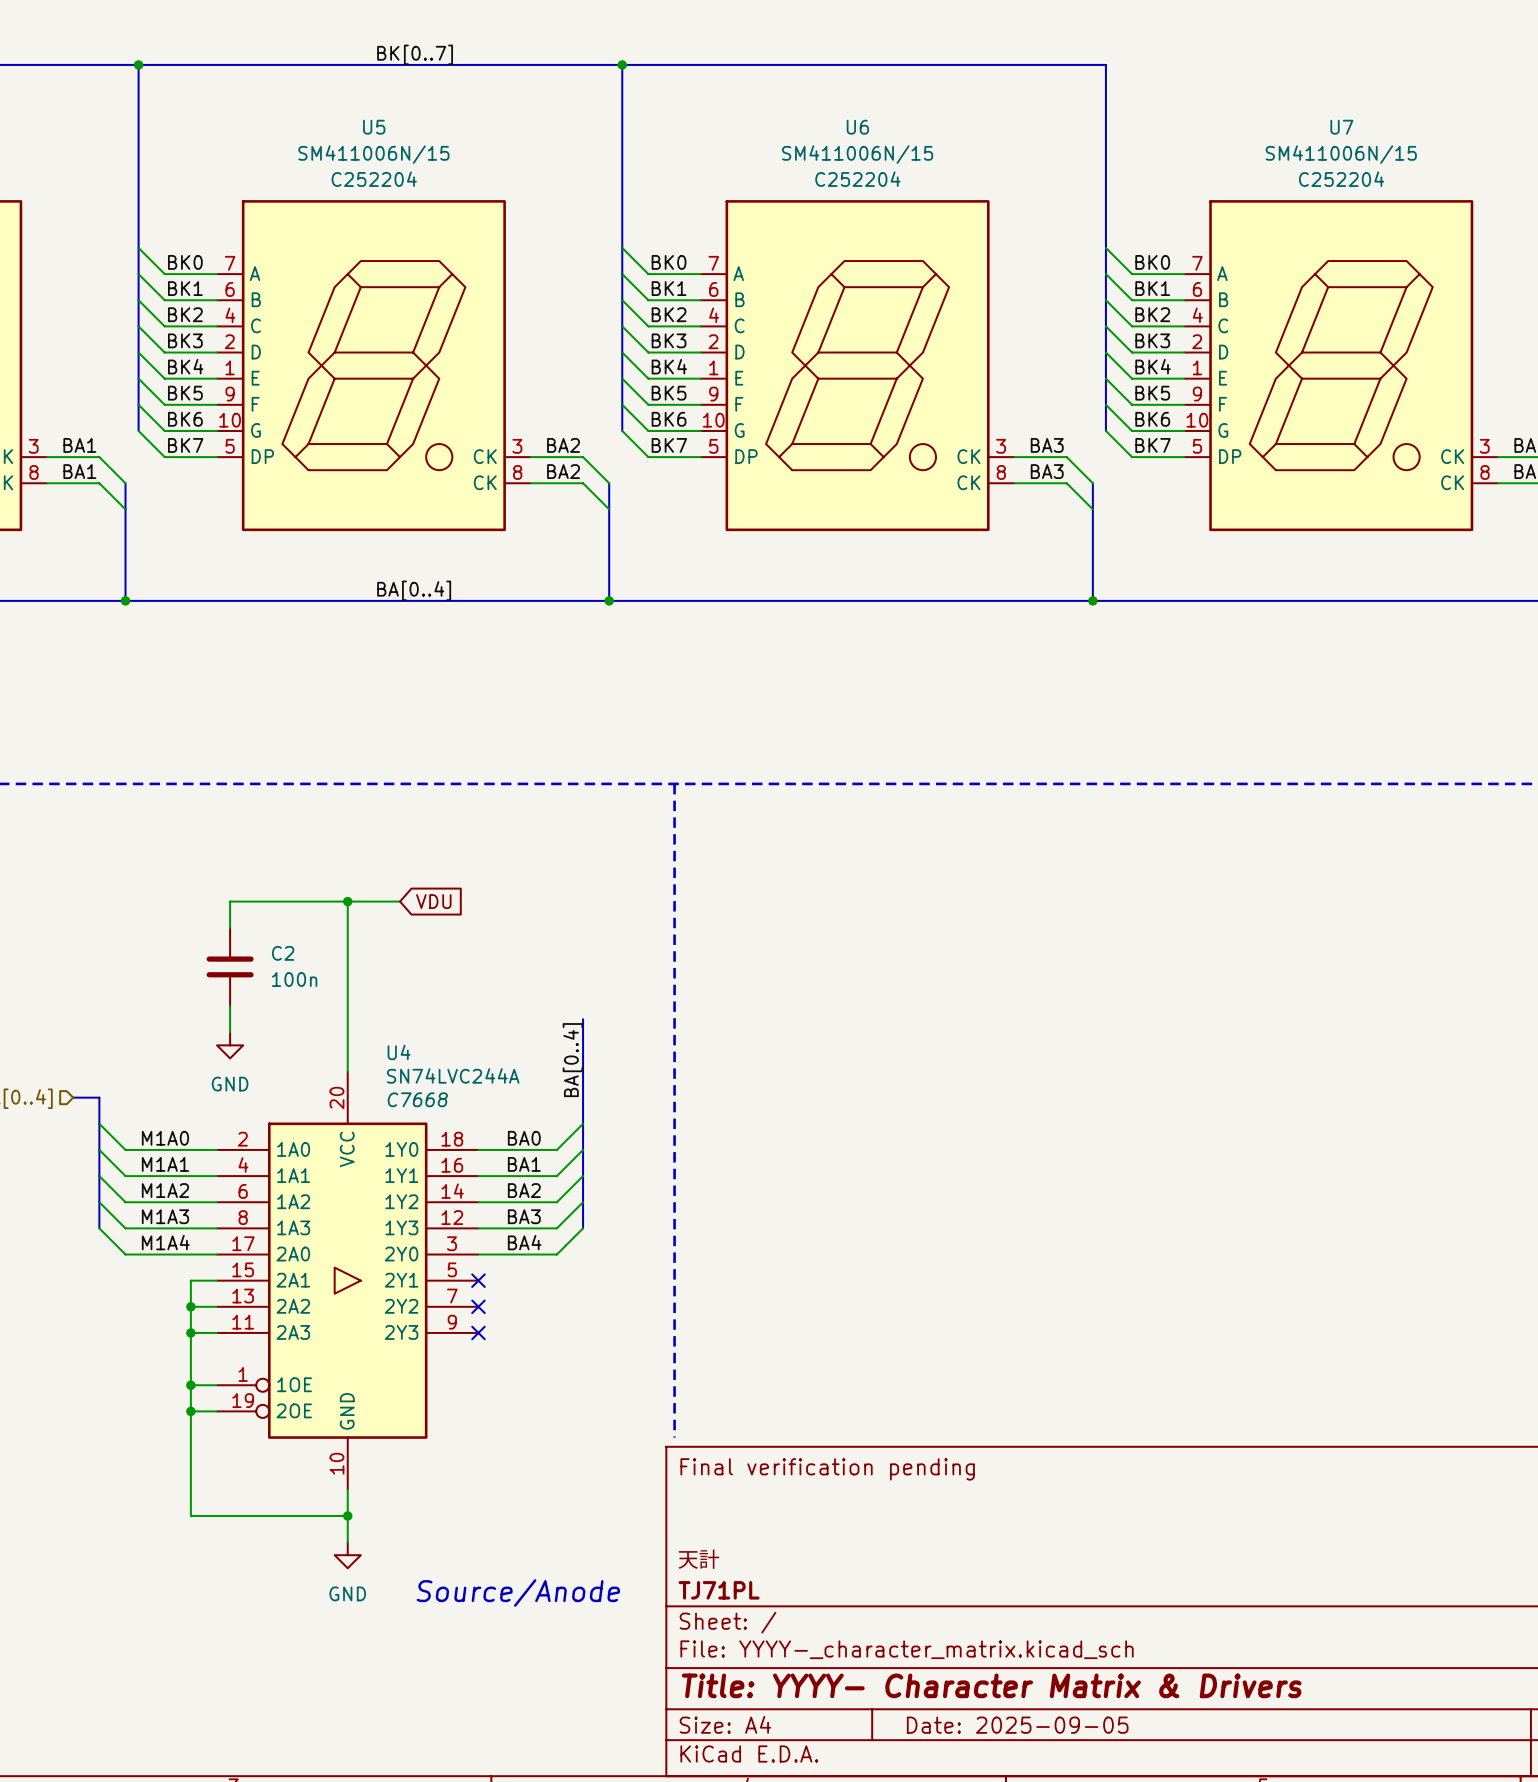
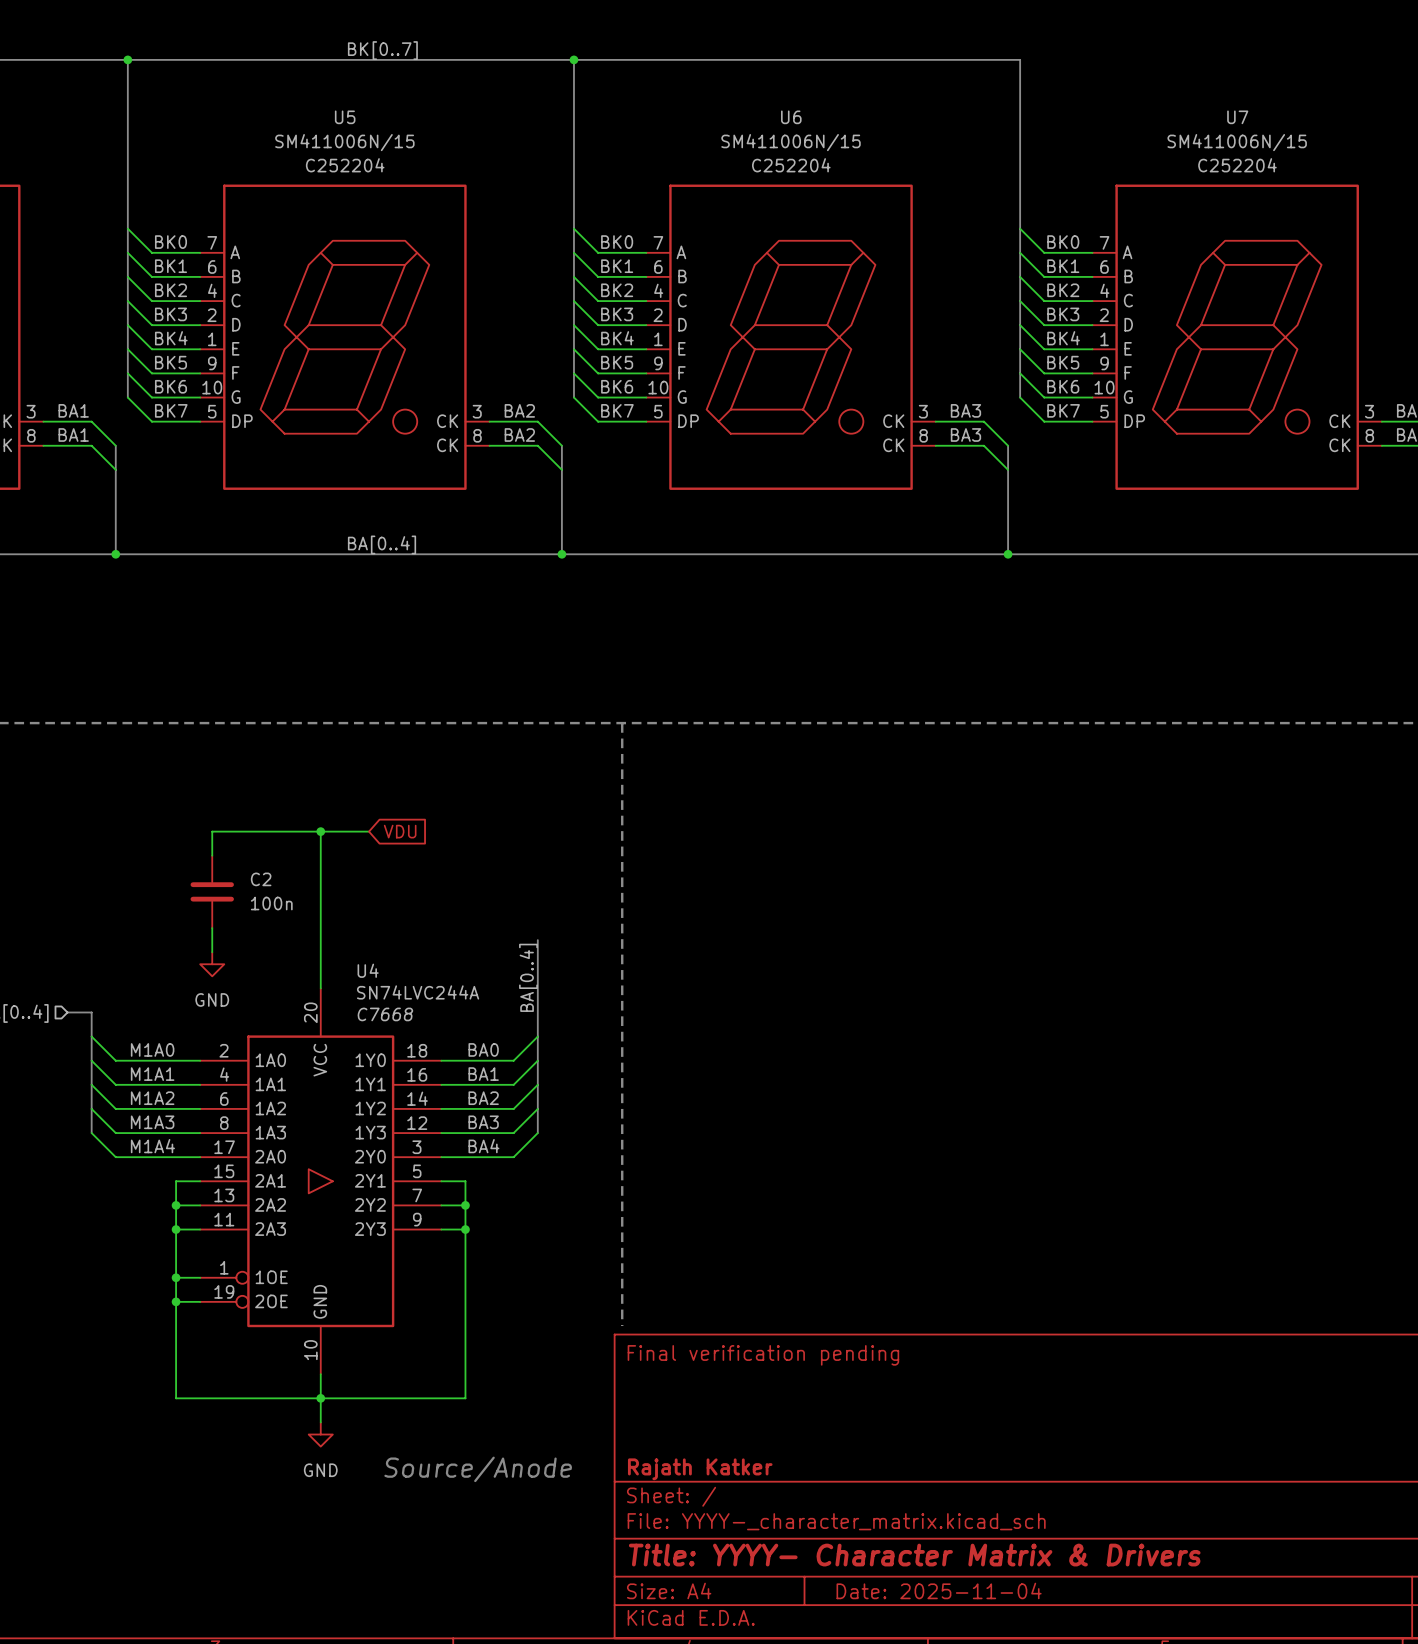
wire: none -> (441, 1181) (465, 1181) (465, 1398) (320, 1398)
no-connect mark: (478, 1280) -> none
wire: none -> (441, 1205) (465, 1205)
no-connect mark: (478, 1306) -> none
junction: none -> (465, 1205)
wire: none -> (441, 1229) (465, 1229)
no-connect mark: (478, 1332) -> none
junction: none -> (465, 1229)
title block: 天計 (698, 1559) -> none
title block: TJ71PL (719, 1590) -> Rajath Katker (700, 1469)
title block: Date: 2025-09-05 (1017, 1725) -> Date: 2025-11-04 (939, 1590)

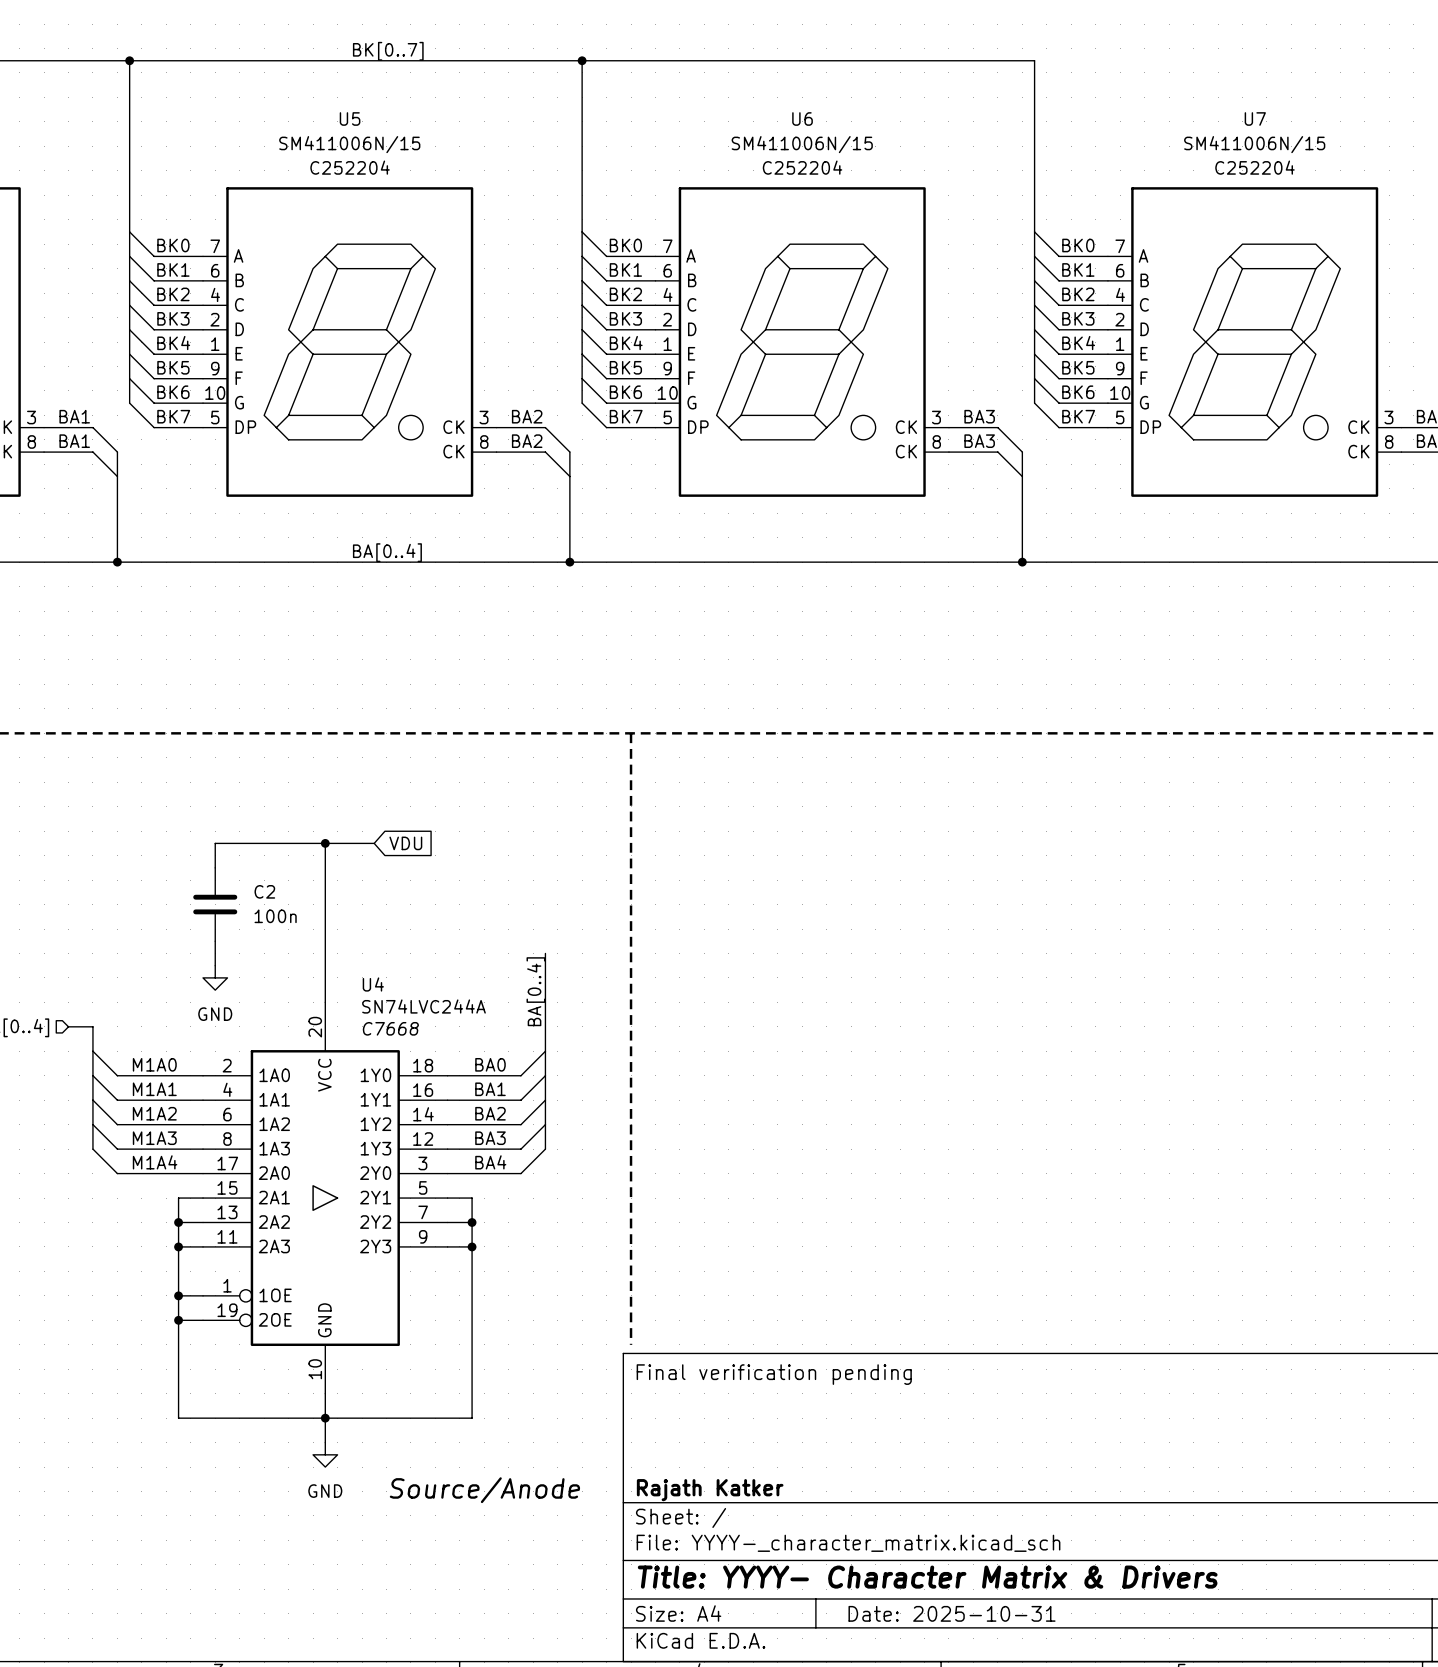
title block: Date: 2025-11-04 (939, 1590) -> Date: 2025-10-31 (952, 1613)

